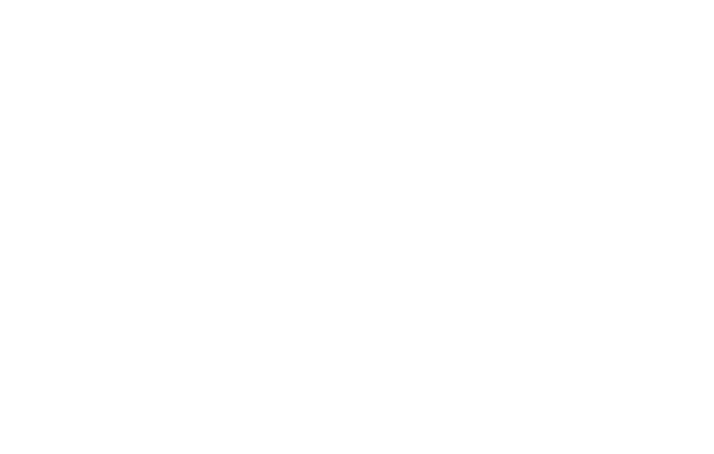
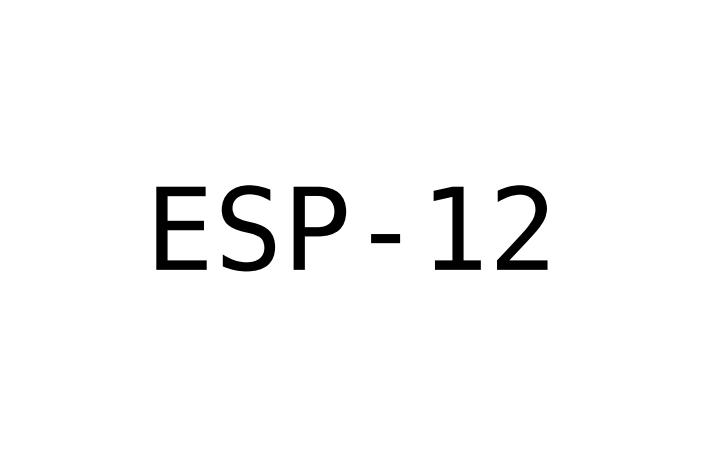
text: none -> ESP-12 (351, 228)

